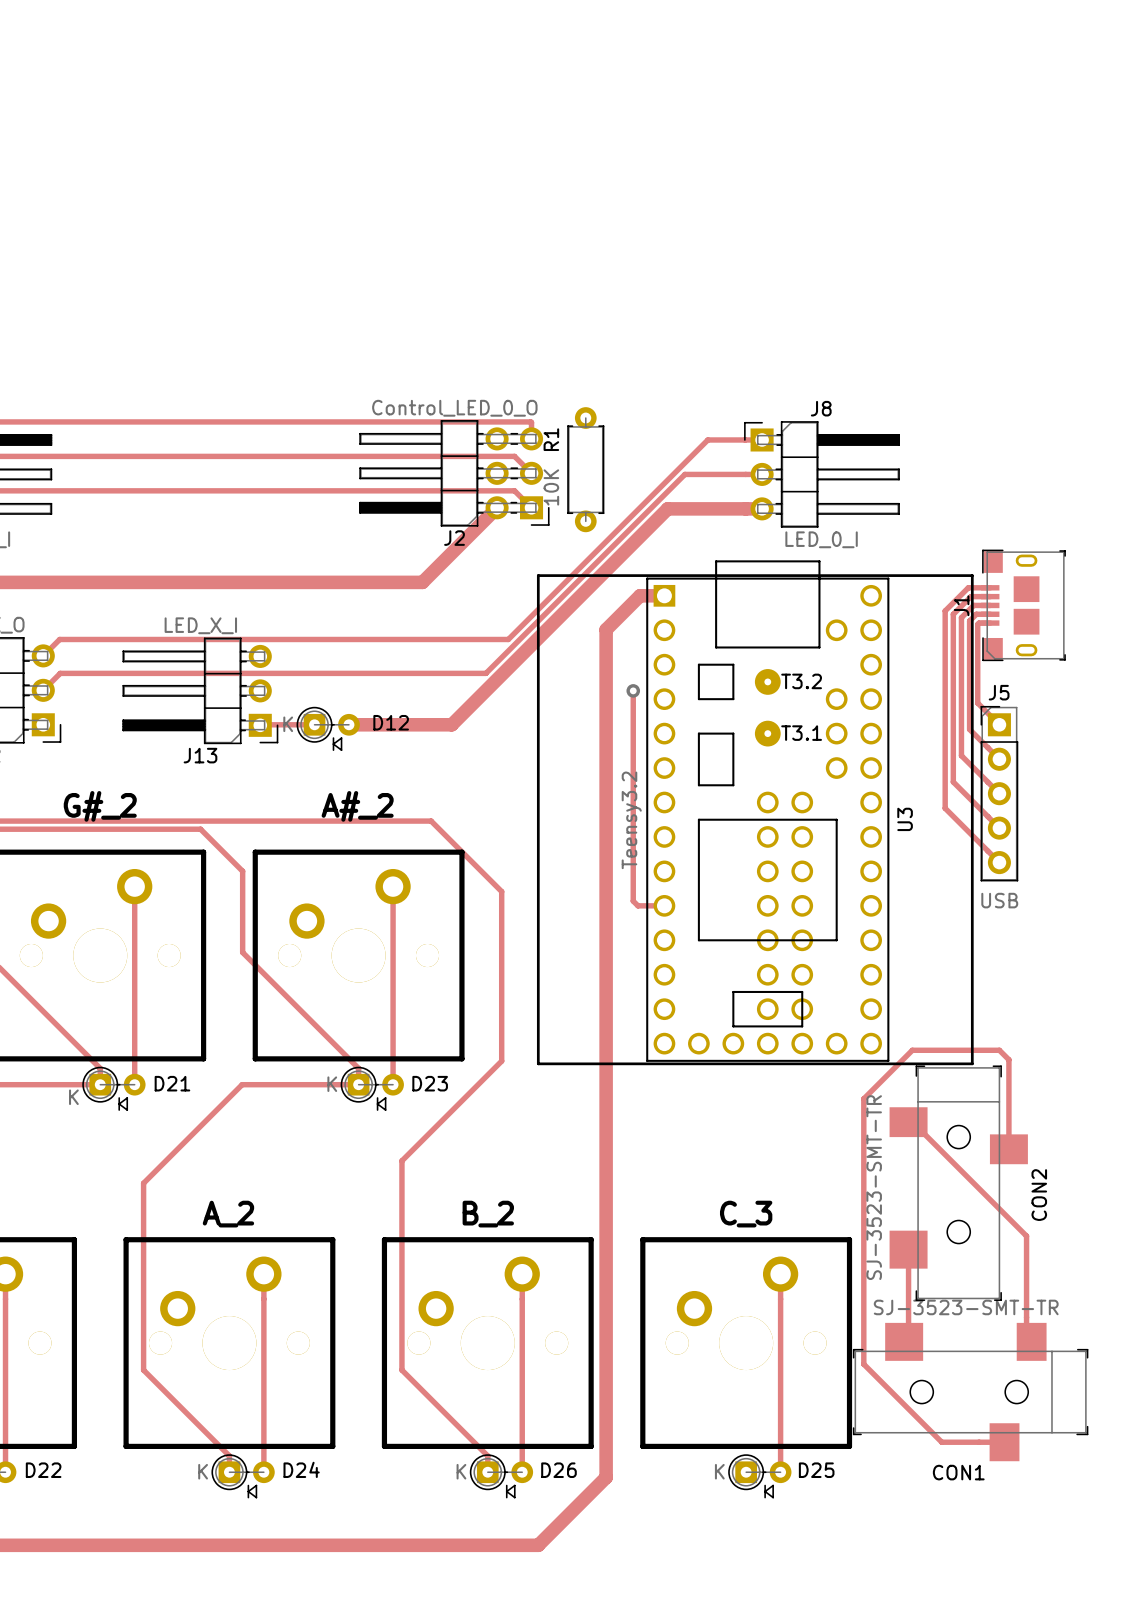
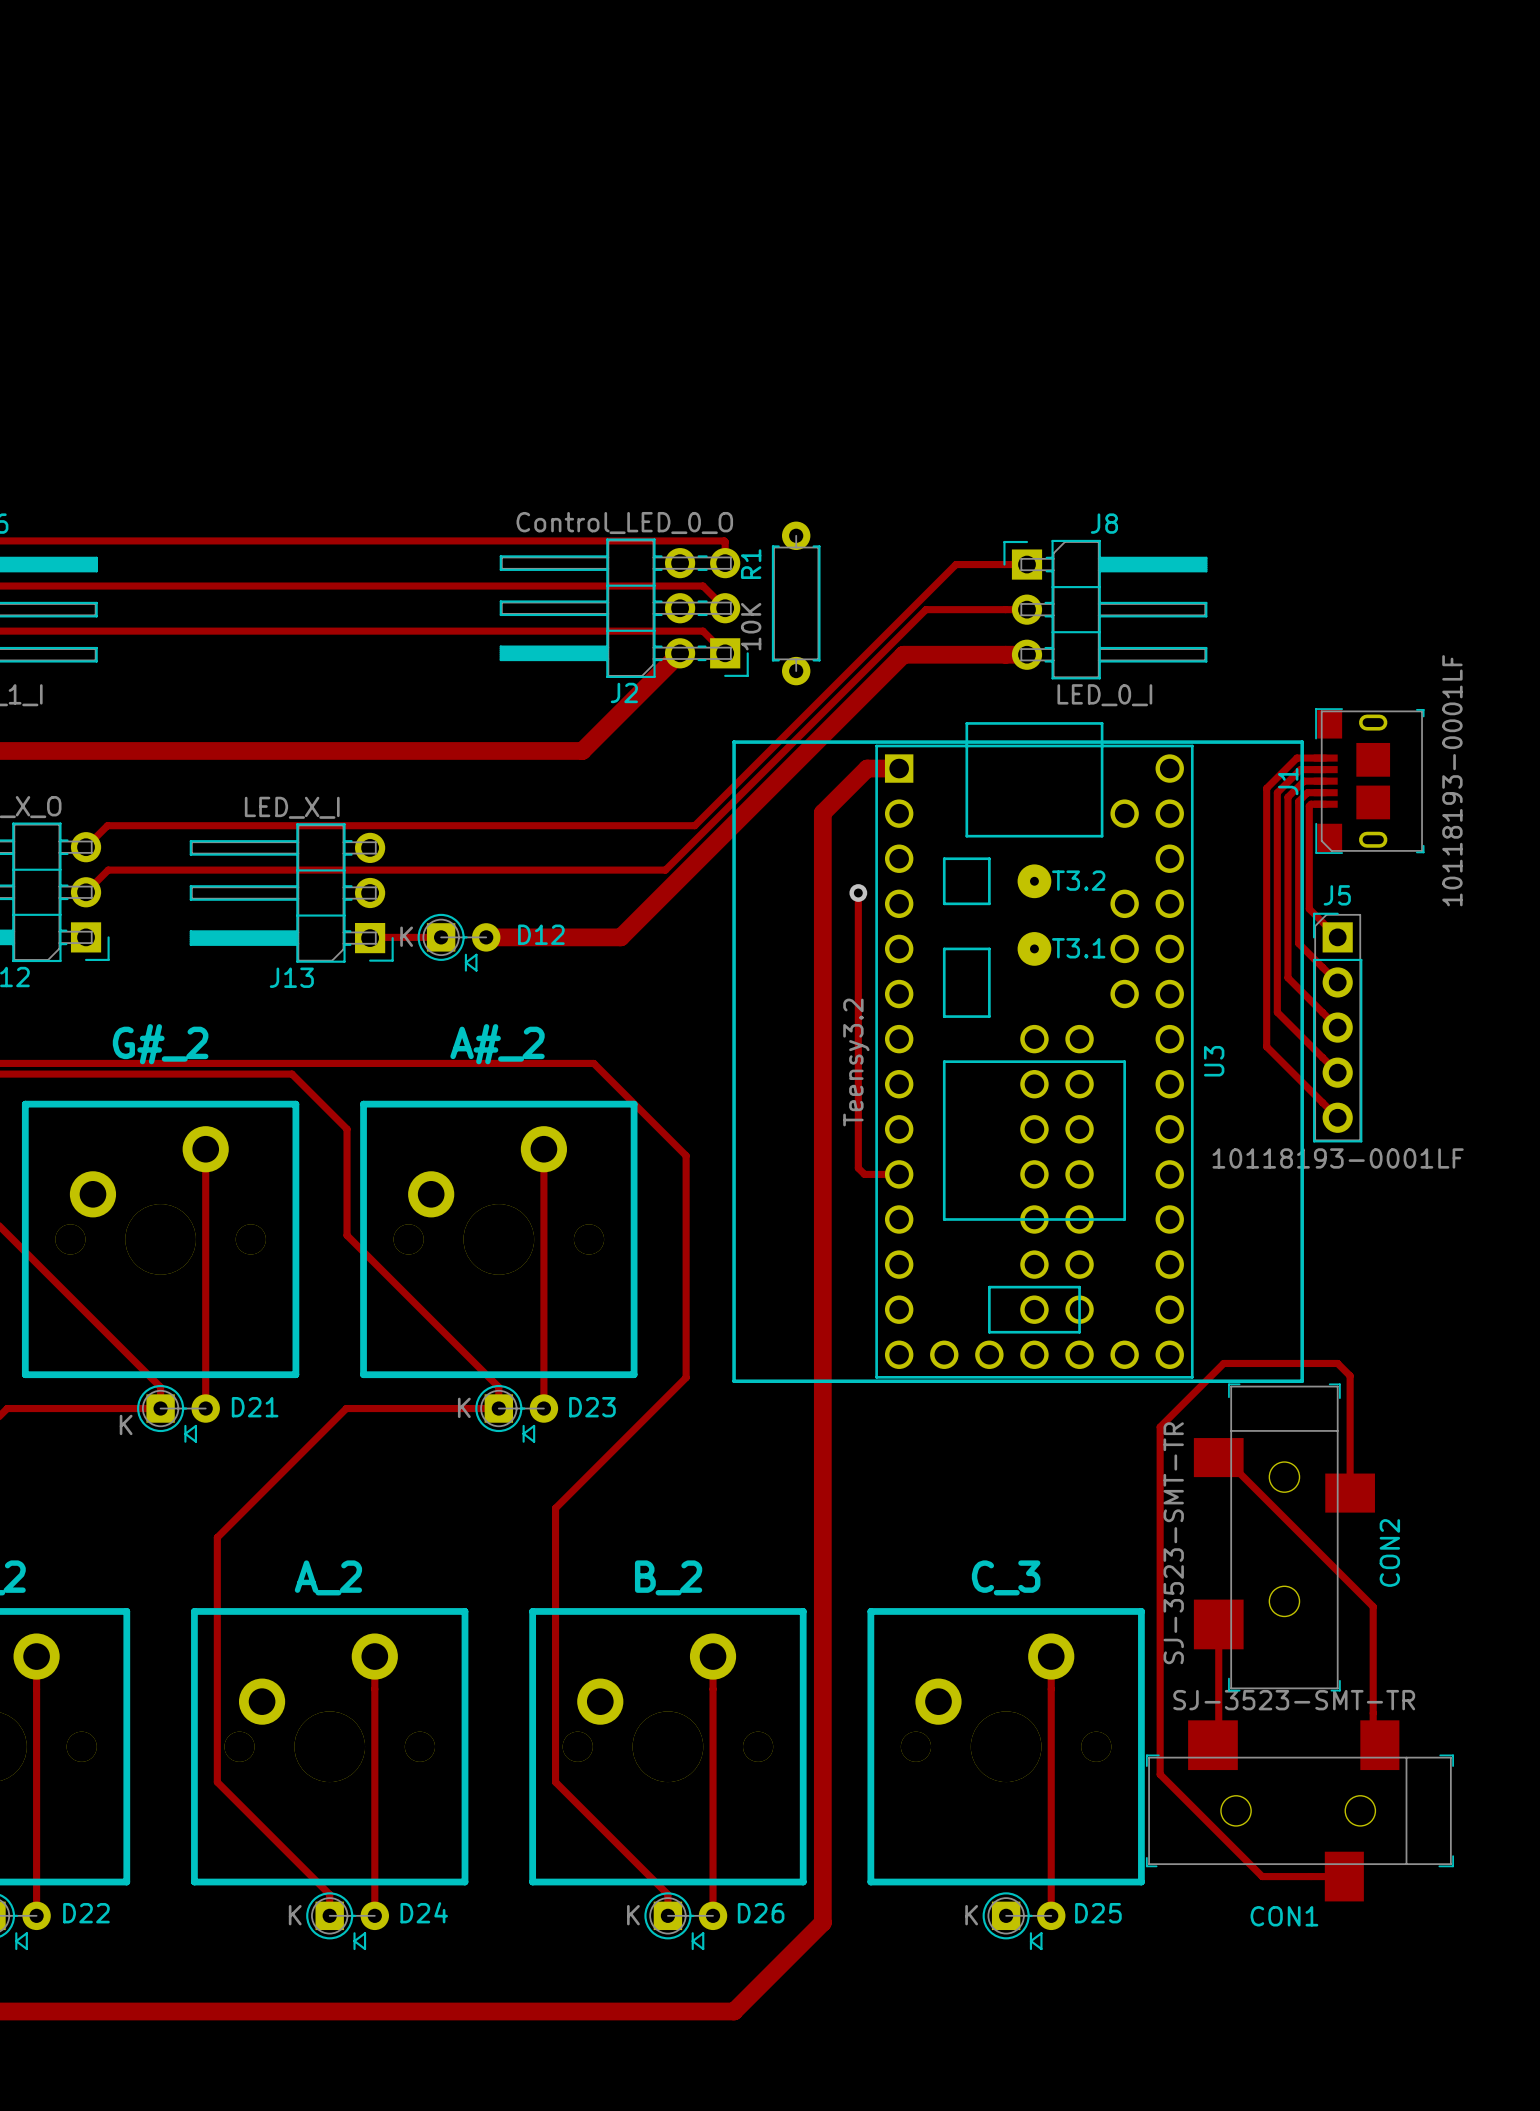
J1 value: none -> 10118193-0001LF (1452, 780)
J5 value: USB (999, 900) -> 10118193-0001LF (1338, 1158)

